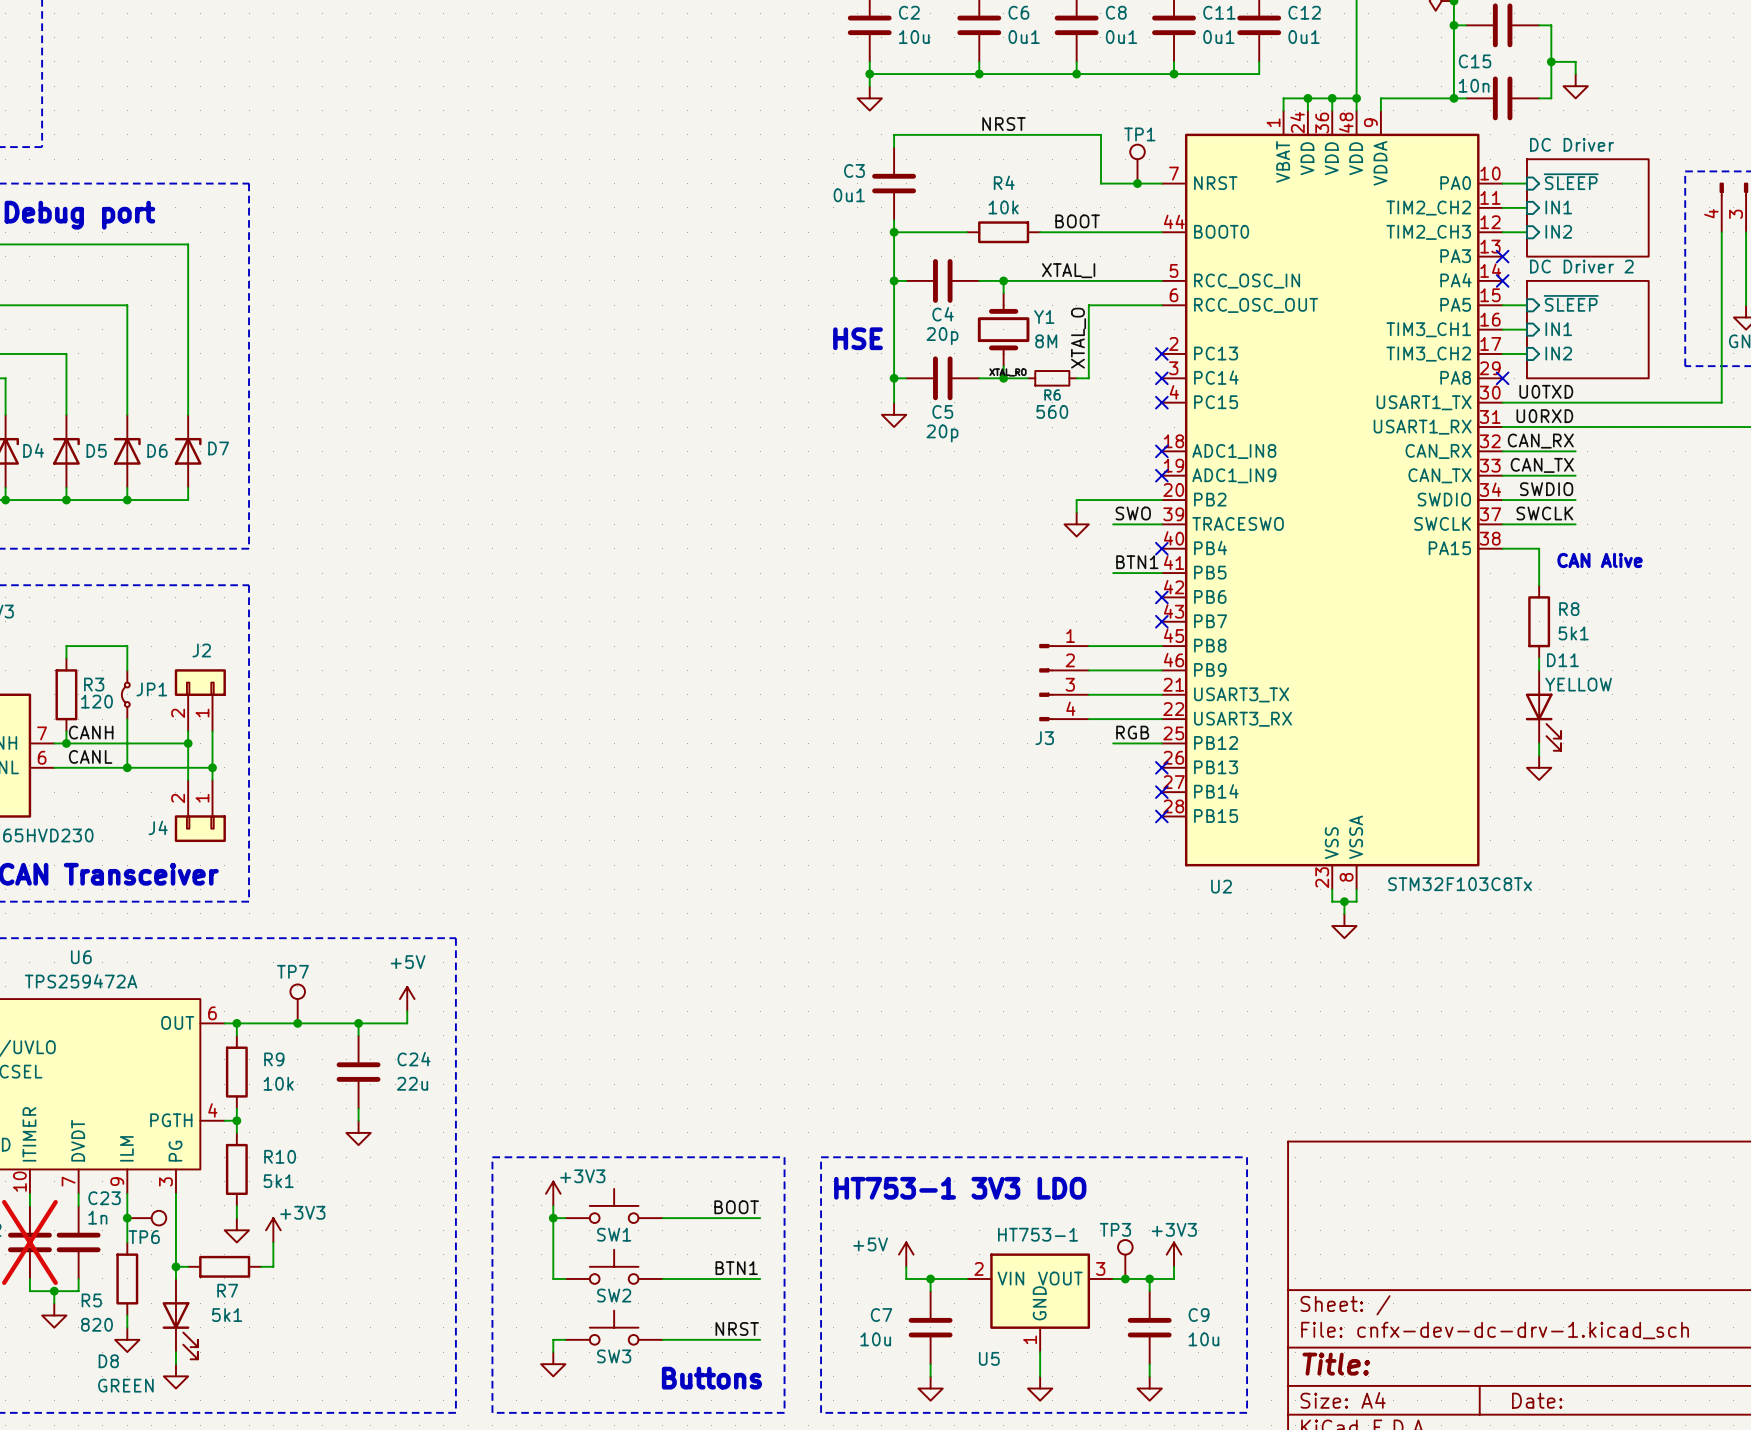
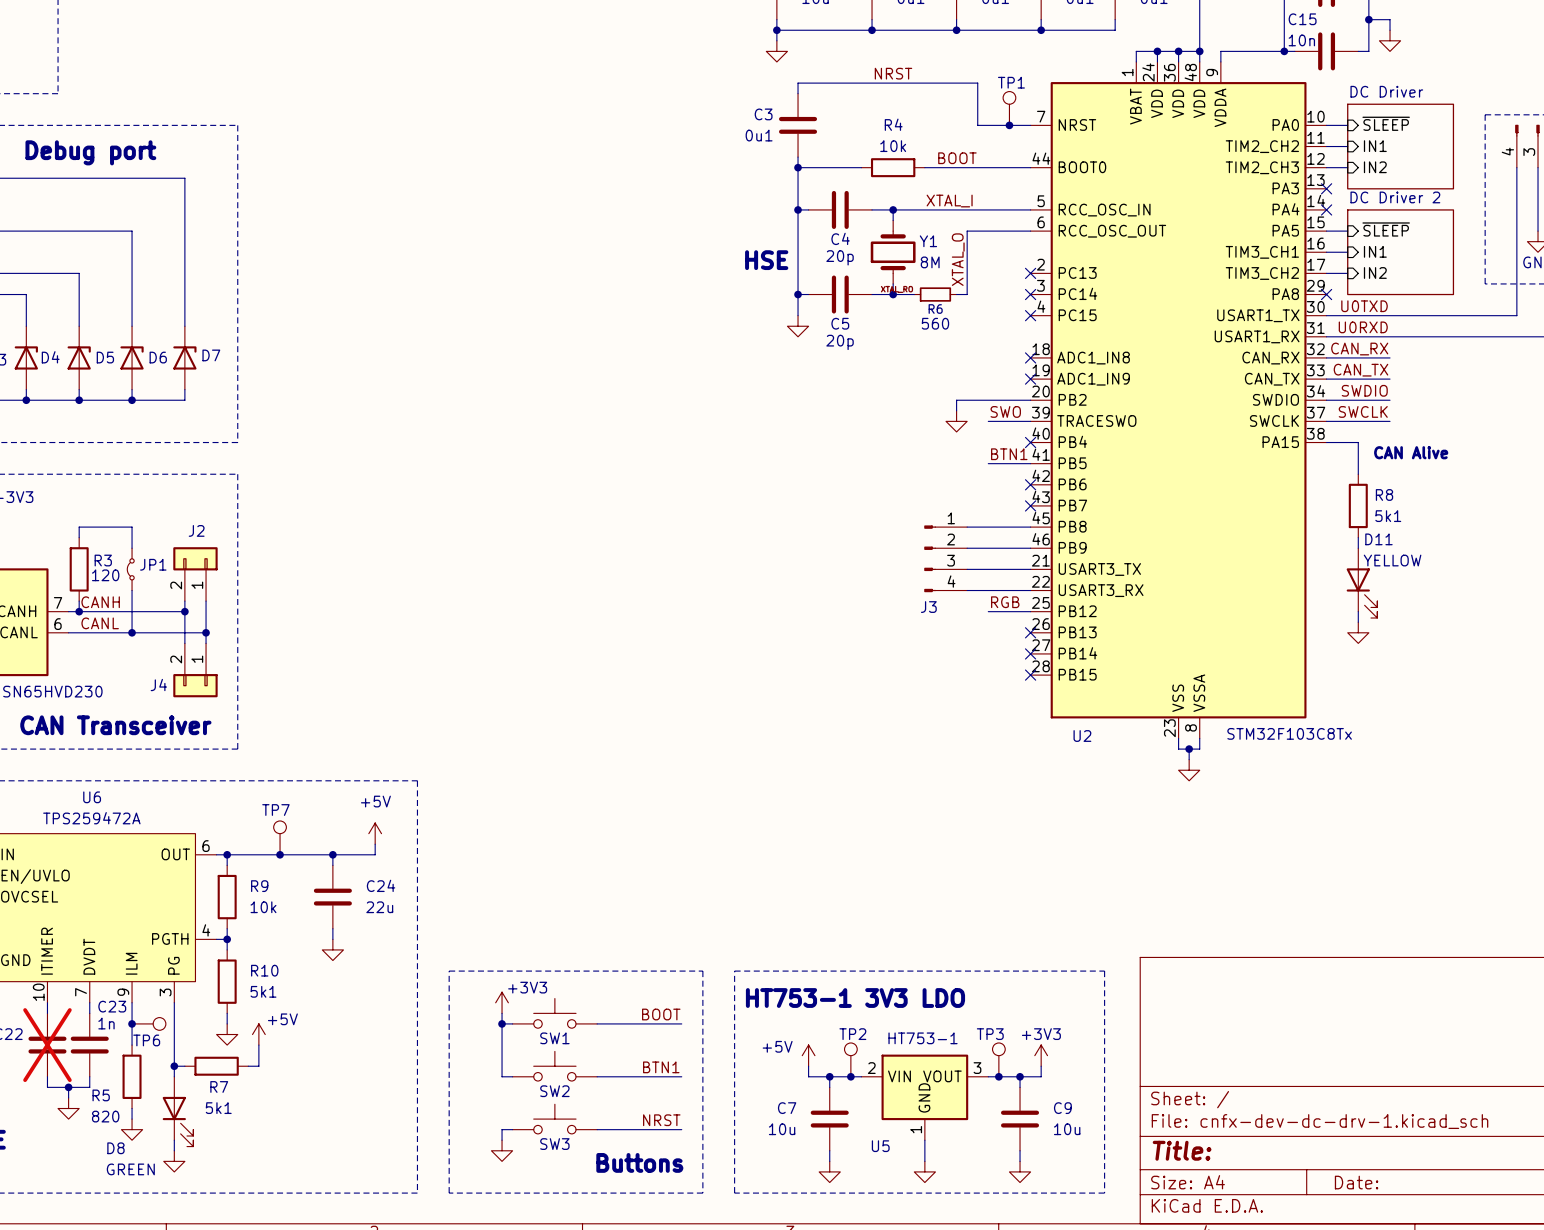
power symbol: +3V3 (273, 1230) -> +5V (258, 1034)
TP2: none -> (850, 1059)
junction: none -> (850, 1076)

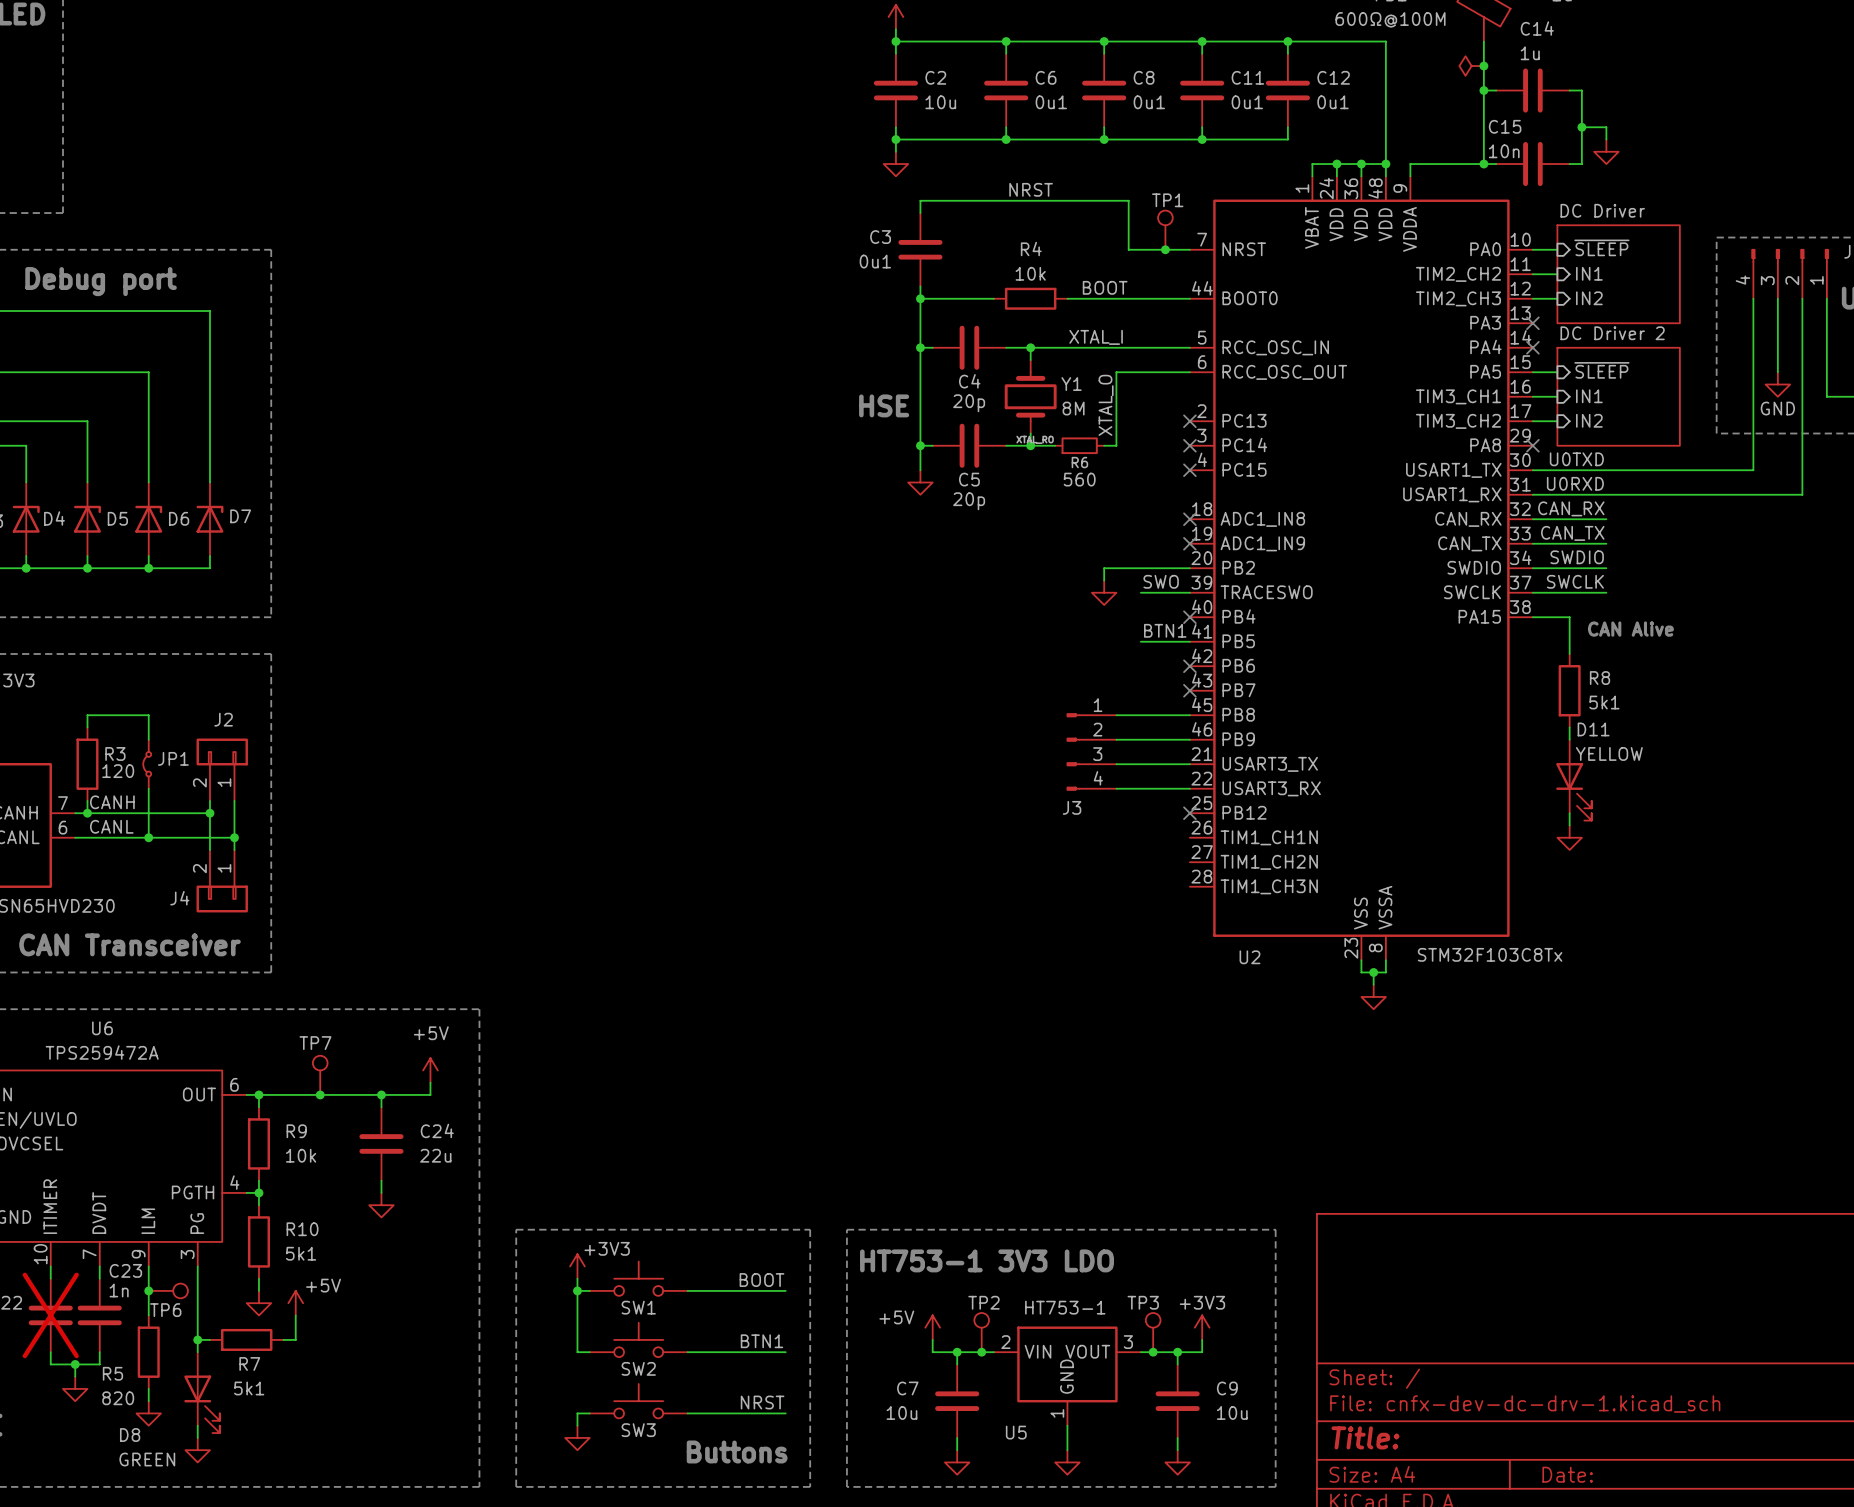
label: RGB (1005, 602) -> none
wire: (988, 611) (1030, 611) -> none
no-connect mark: none -> (1189, 813)
no-connect mark: (1030, 632) -> none
U2 pin name: PB13 (1077, 632) -> TIM1_CH1N (1269, 837)
no-connect mark: (1030, 653) -> none
U2 pin name: PB14 (1077, 653) -> TIM1_CH2N (1269, 862)
U2 pin name: PB15 (1077, 674) -> TIM1_CH3N (1269, 886)
no-connect mark: (1030, 675) -> none

